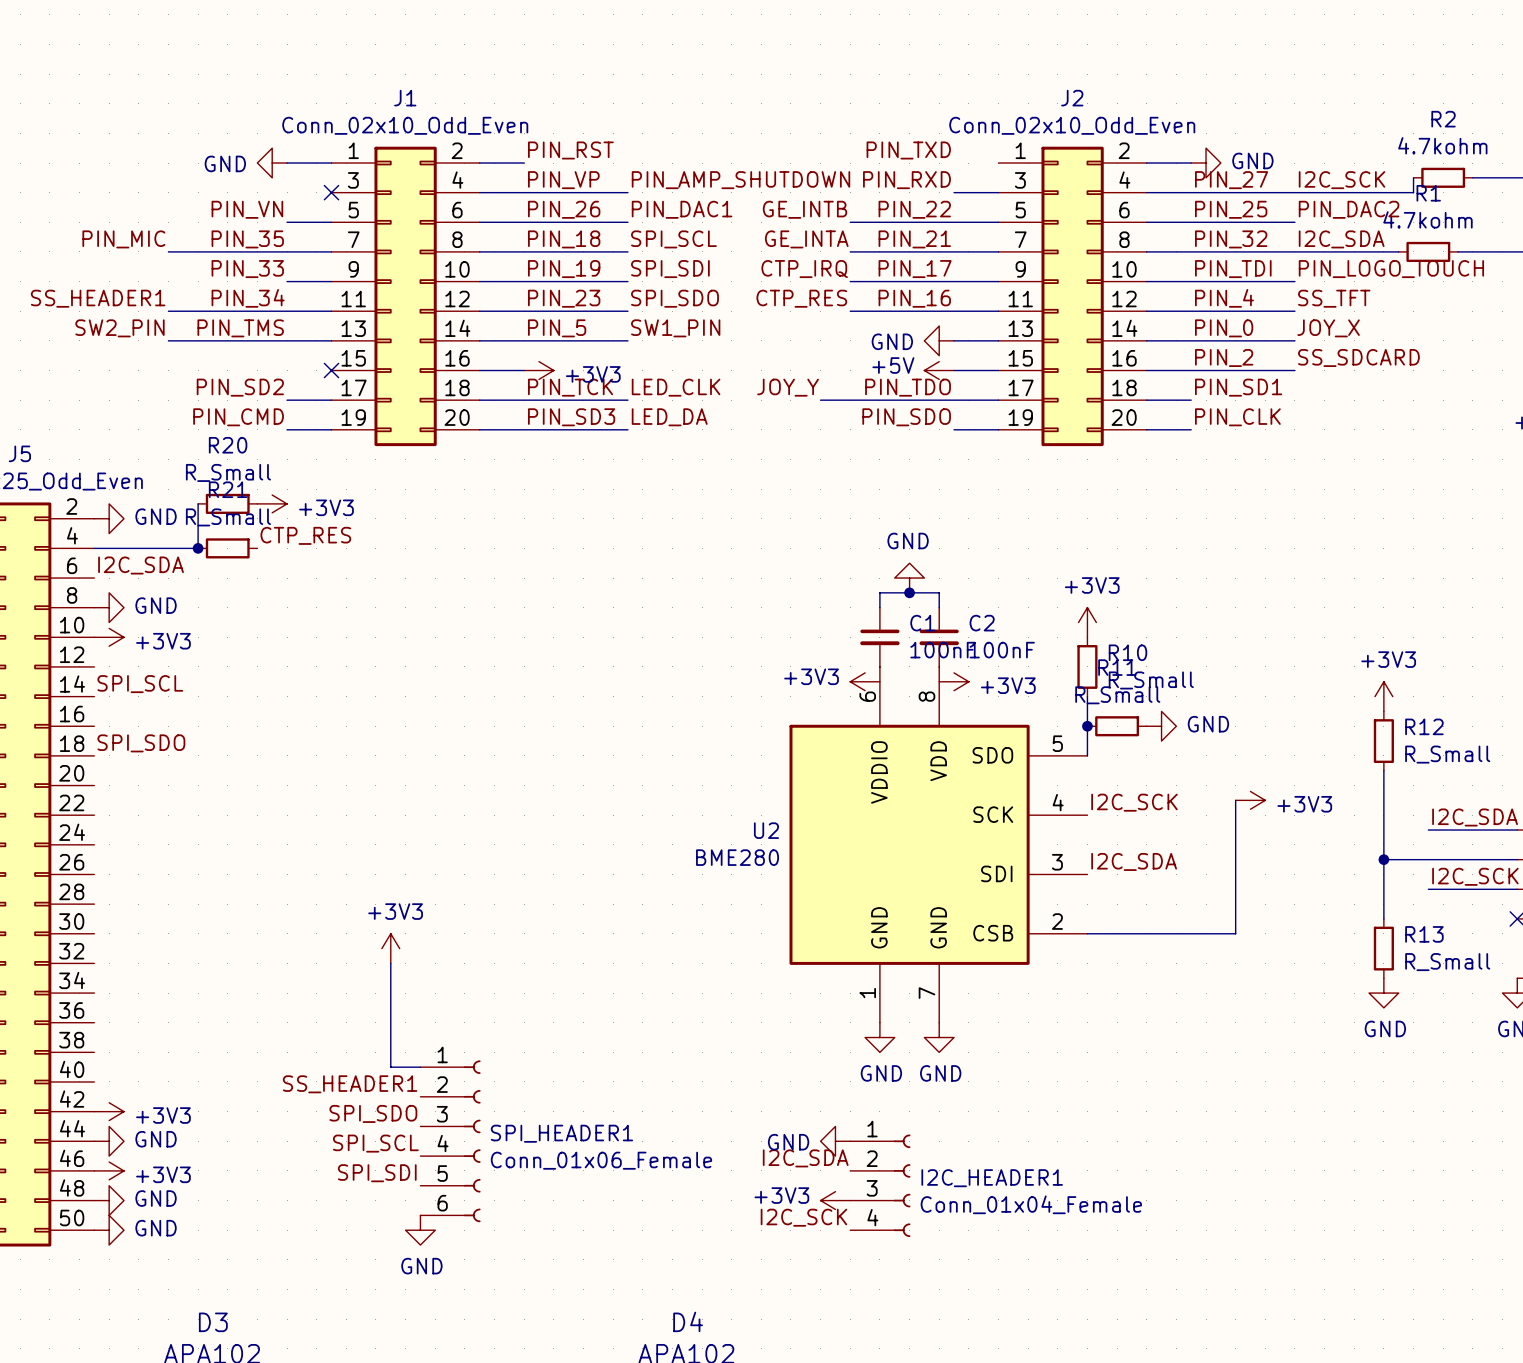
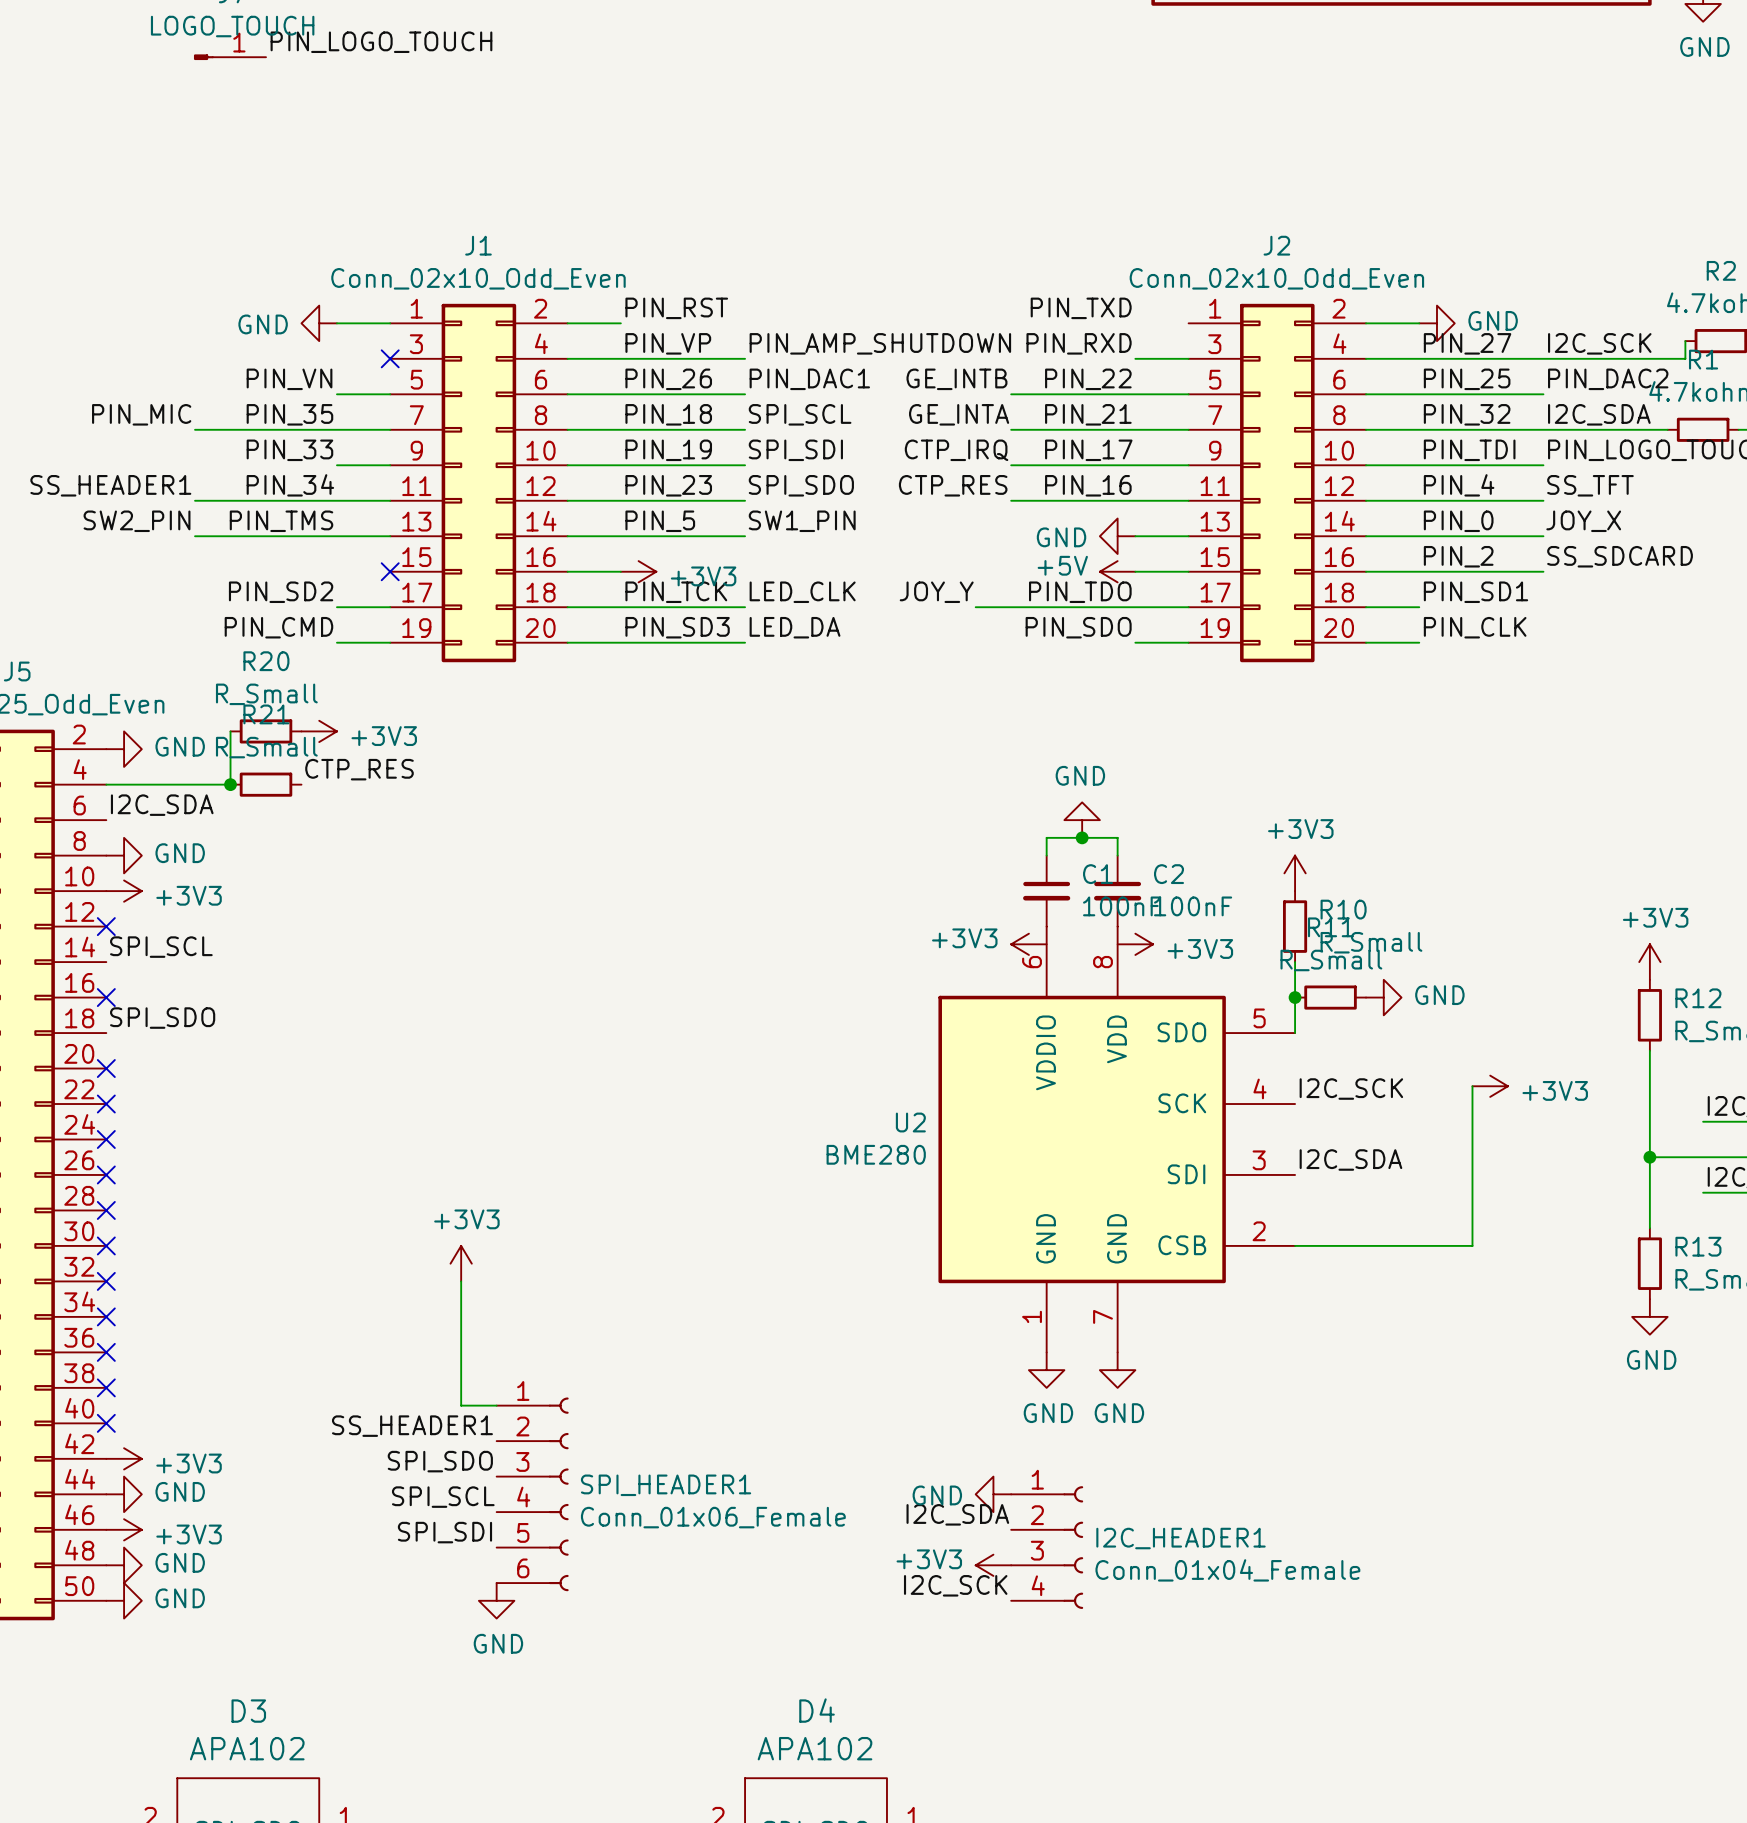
no-connect mark: none -> (106, 926)
no-connect mark: none -> (106, 997)
no-connect mark: none -> (106, 1068)
no-connect mark: none -> (106, 1104)
no-connect mark: none -> (106, 1139)
no-connect mark: none -> (106, 1174)
no-connect mark: none -> (106, 1210)
no-connect mark: none -> (106, 1245)
no-connect mark: none -> (106, 1281)
no-connect mark: none -> (106, 1316)
no-connect mark: none -> (106, 1352)
no-connect mark: none -> (106, 1387)
no-connect mark: none -> (106, 1423)

